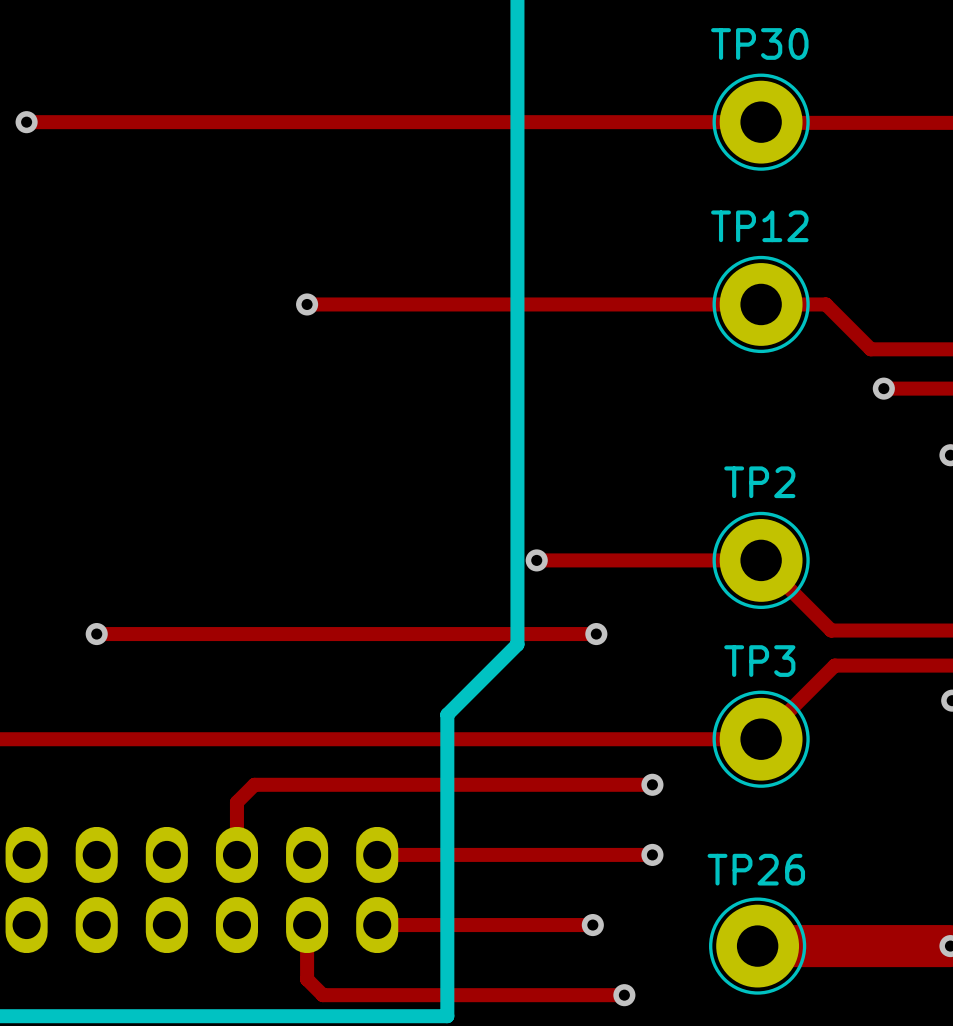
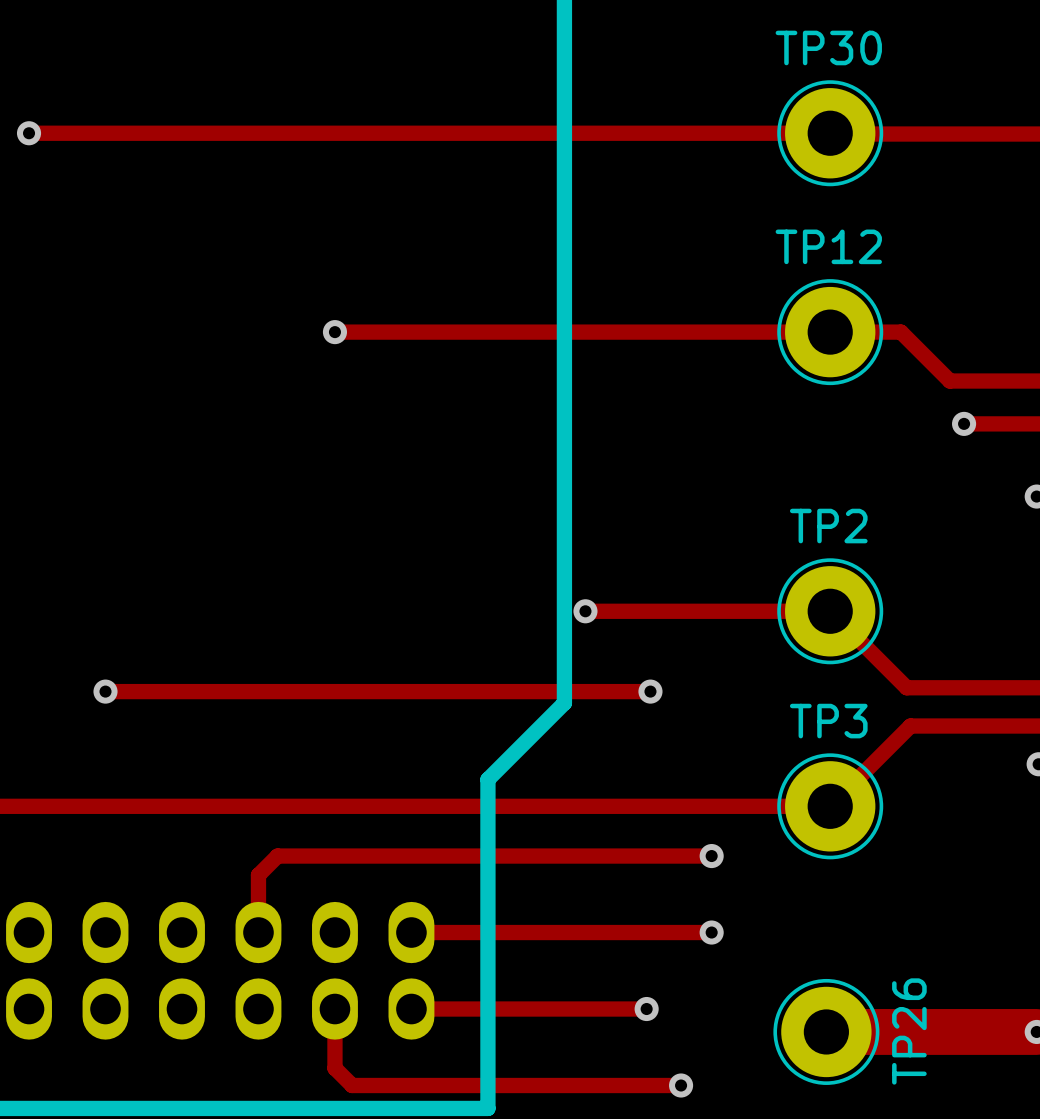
TP26 name rotation: 0° (756, 869) -> 90° counterclockwise (909, 1031)

